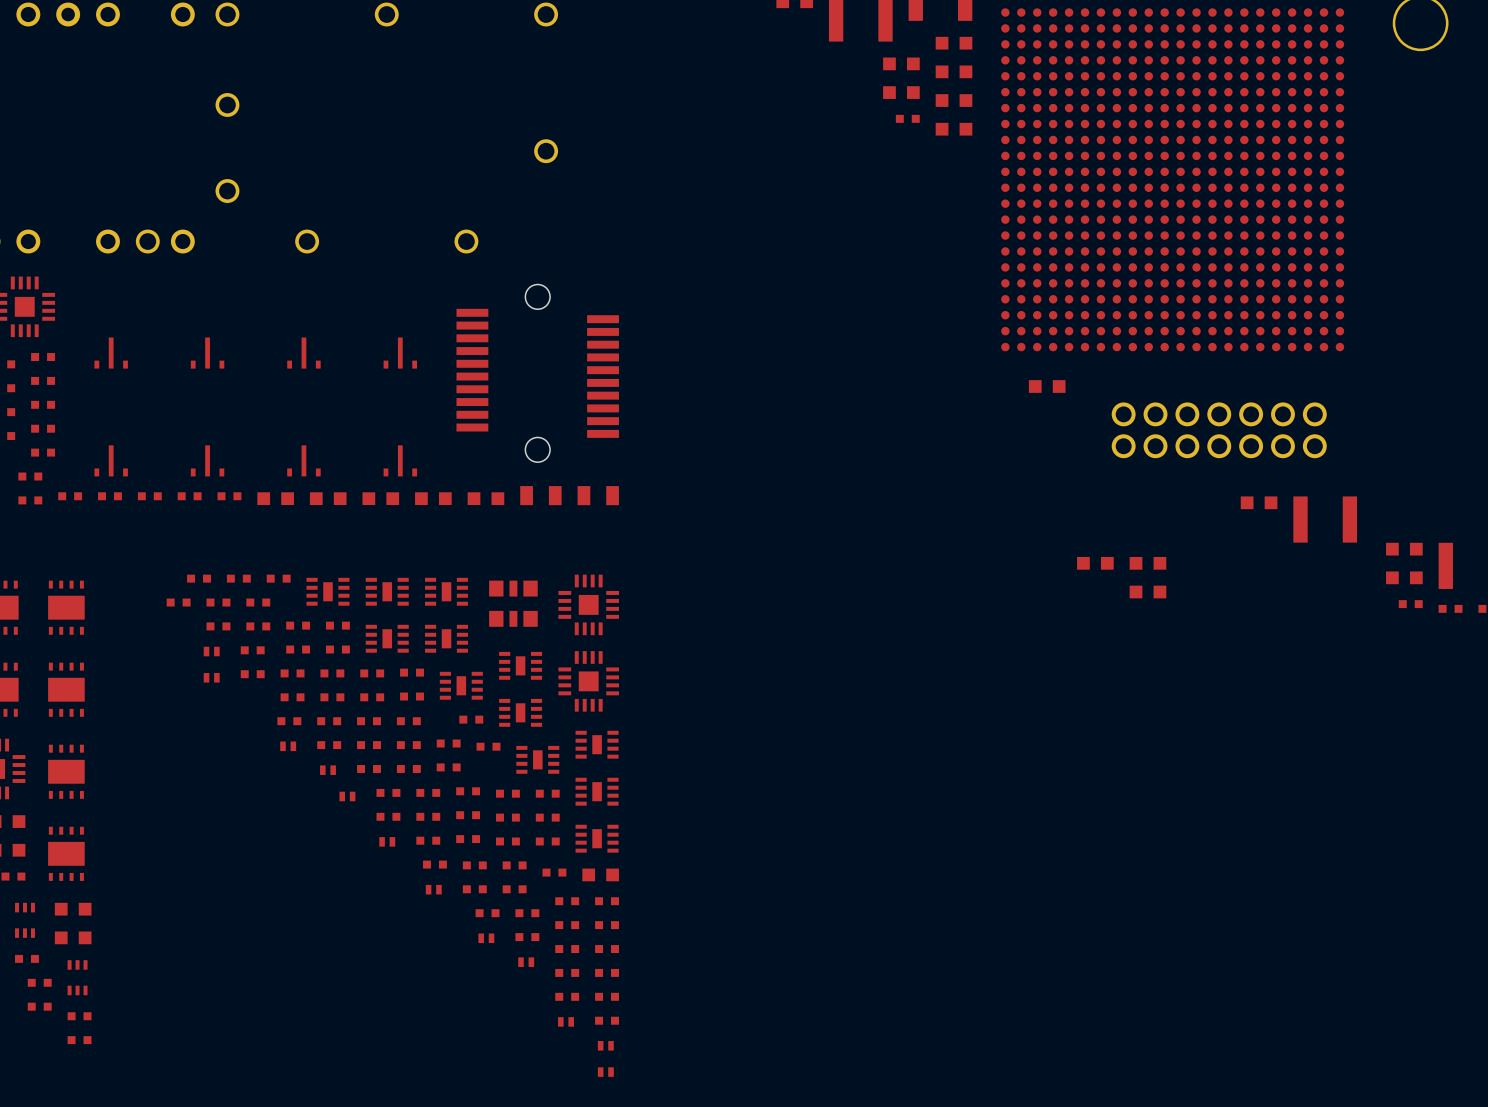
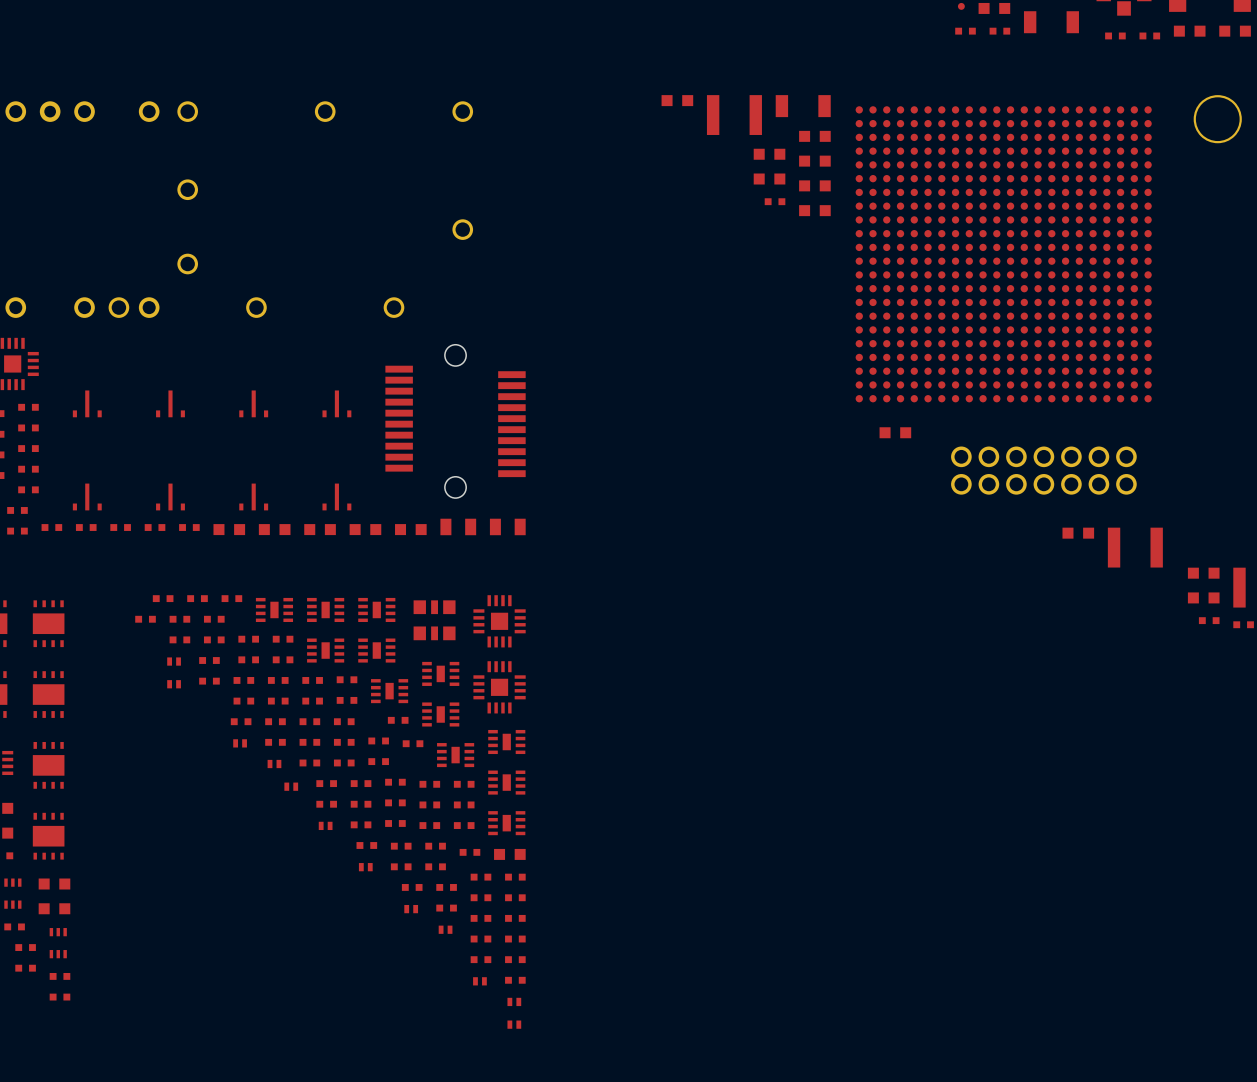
part: (1095, 563) -> none
part: (1147, 563) -> none
part: (1147, 592) -> none

